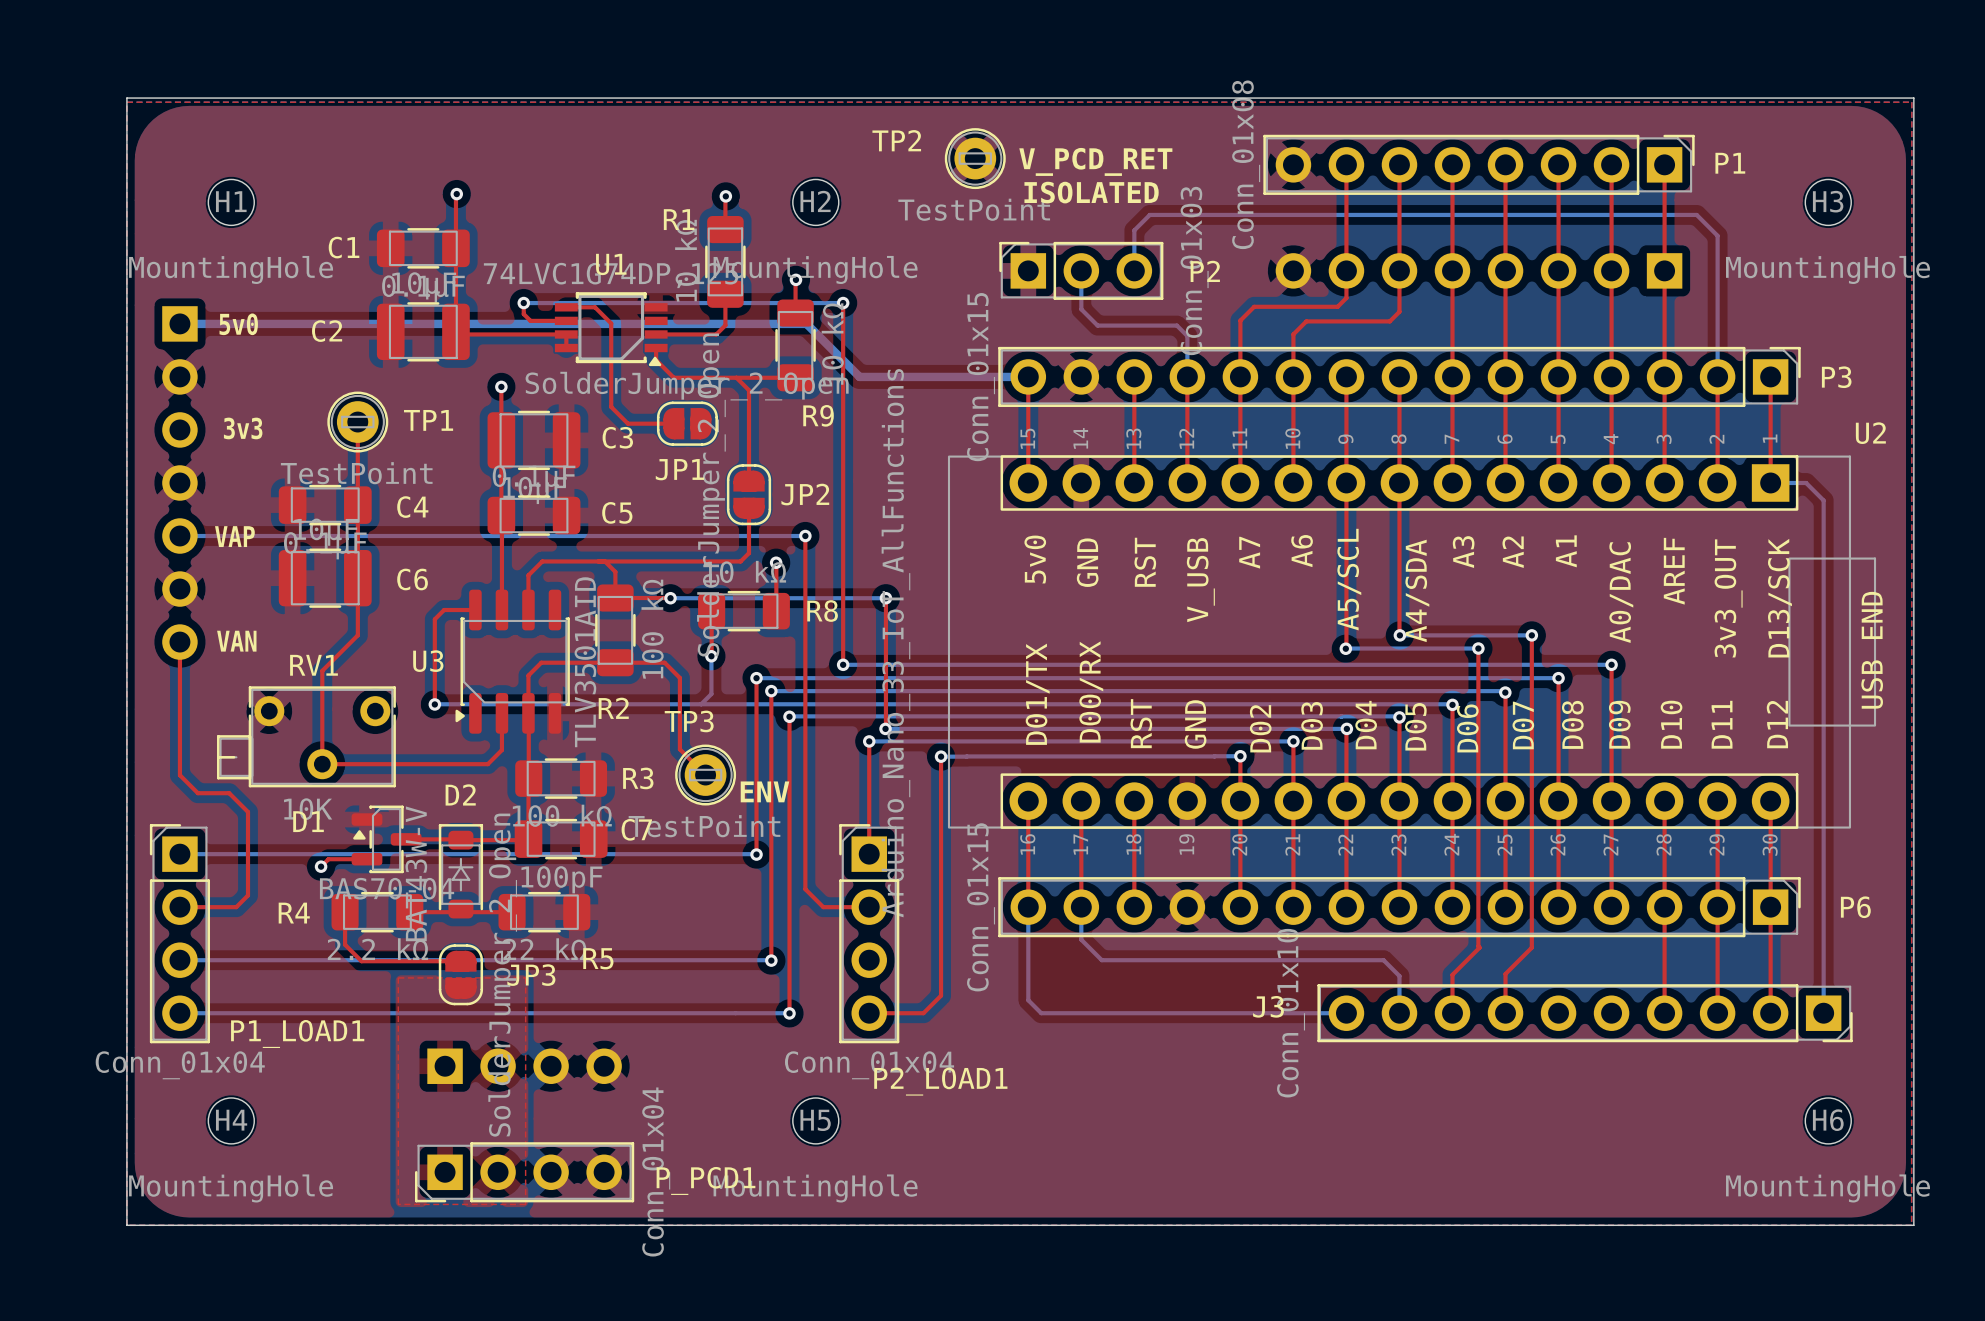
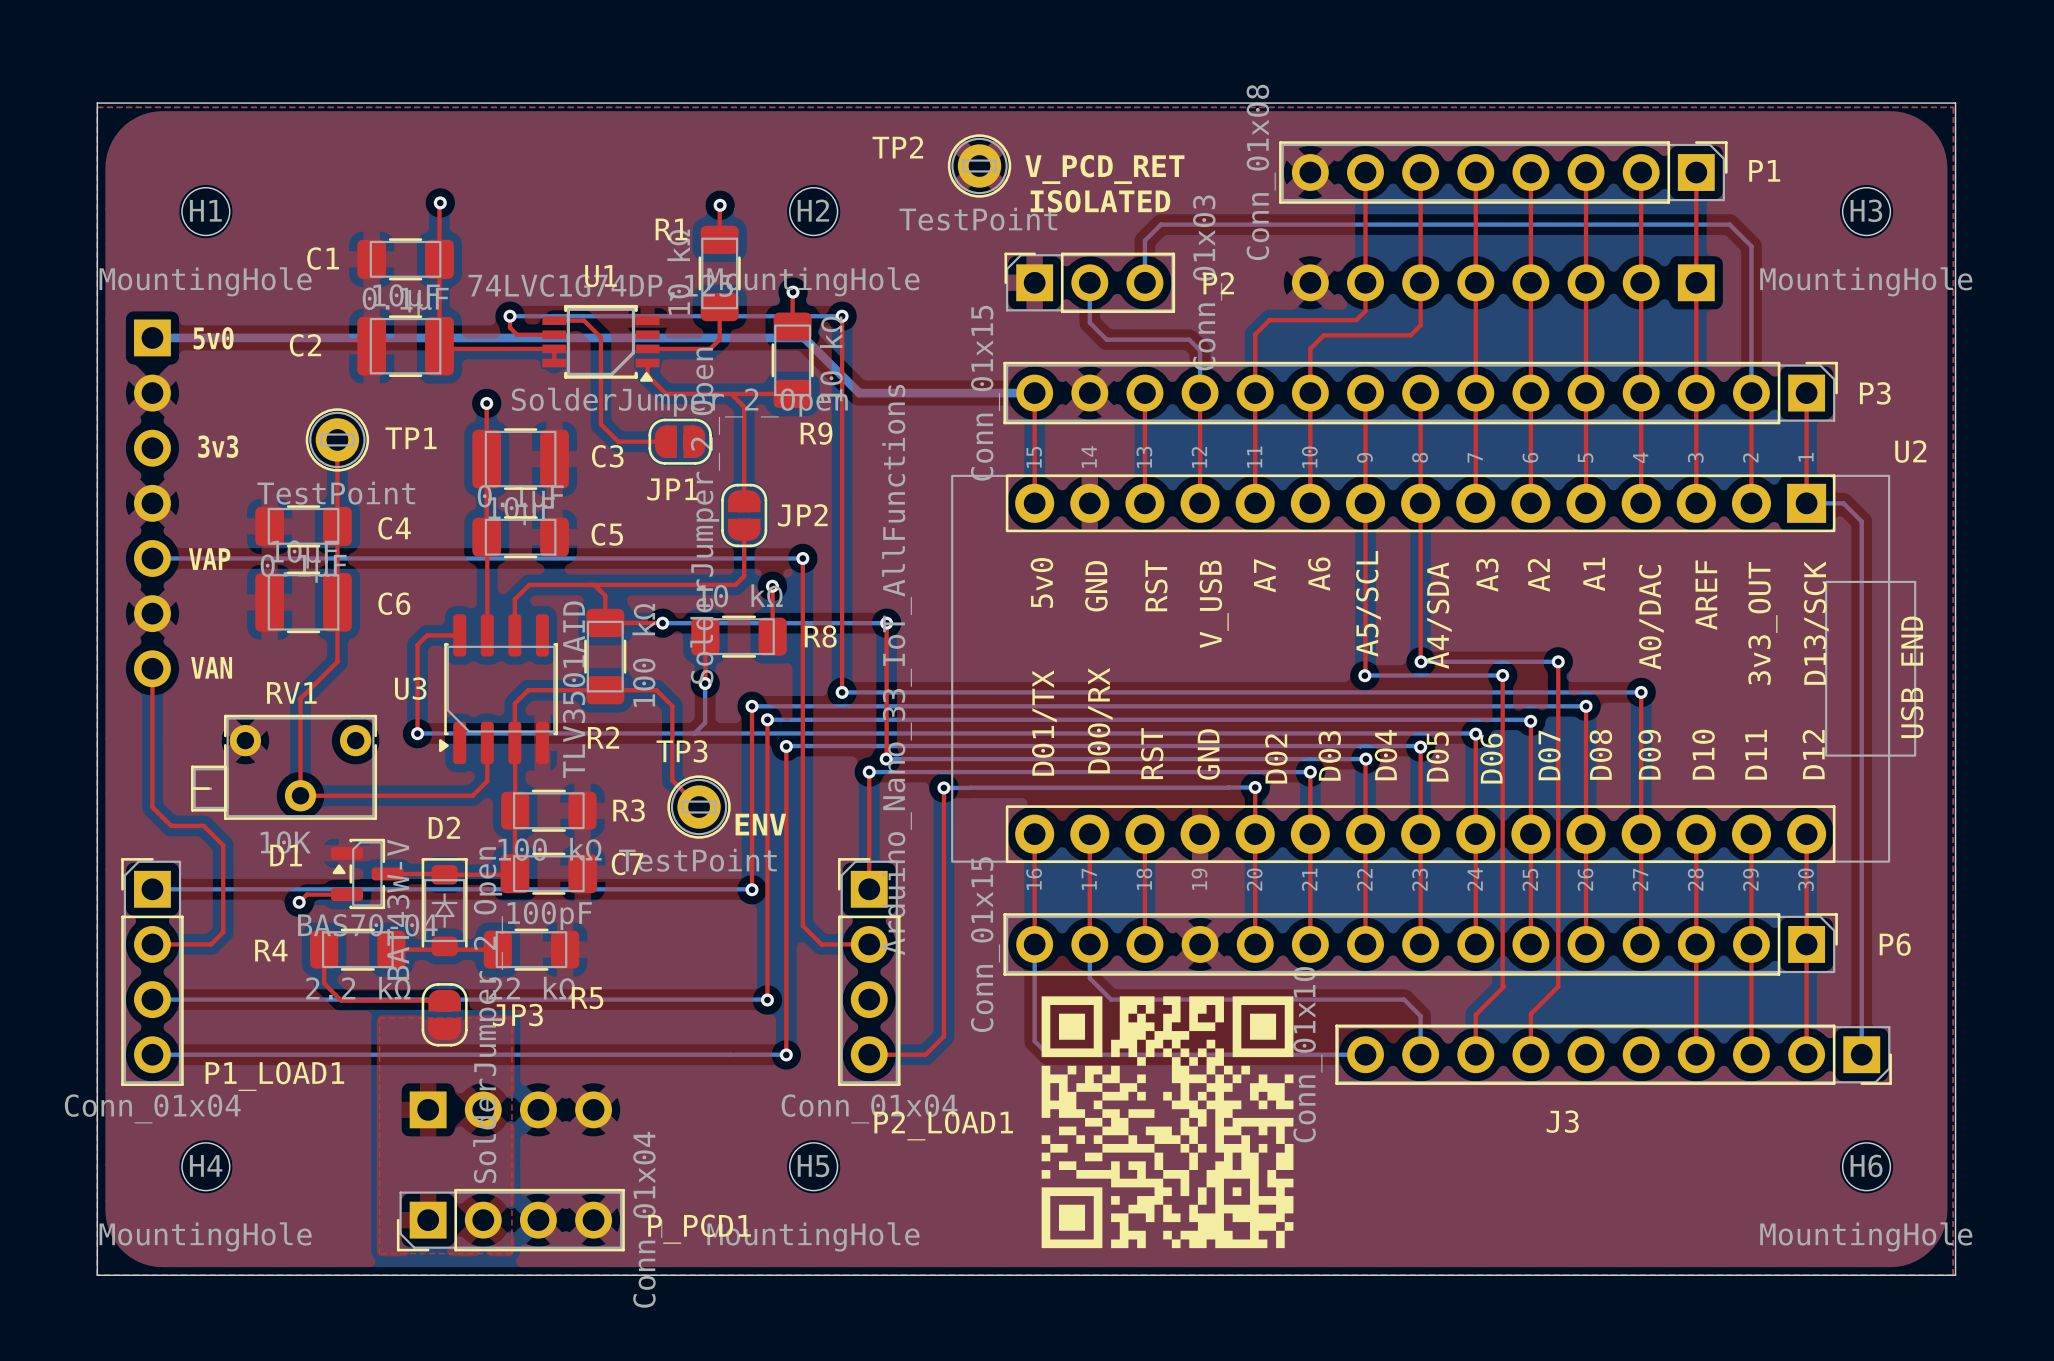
drawing: none -> [1041, 996, 1294, 1249]
J3 name position: J3 (1268, 1006) -> J3 (1562, 1121)

